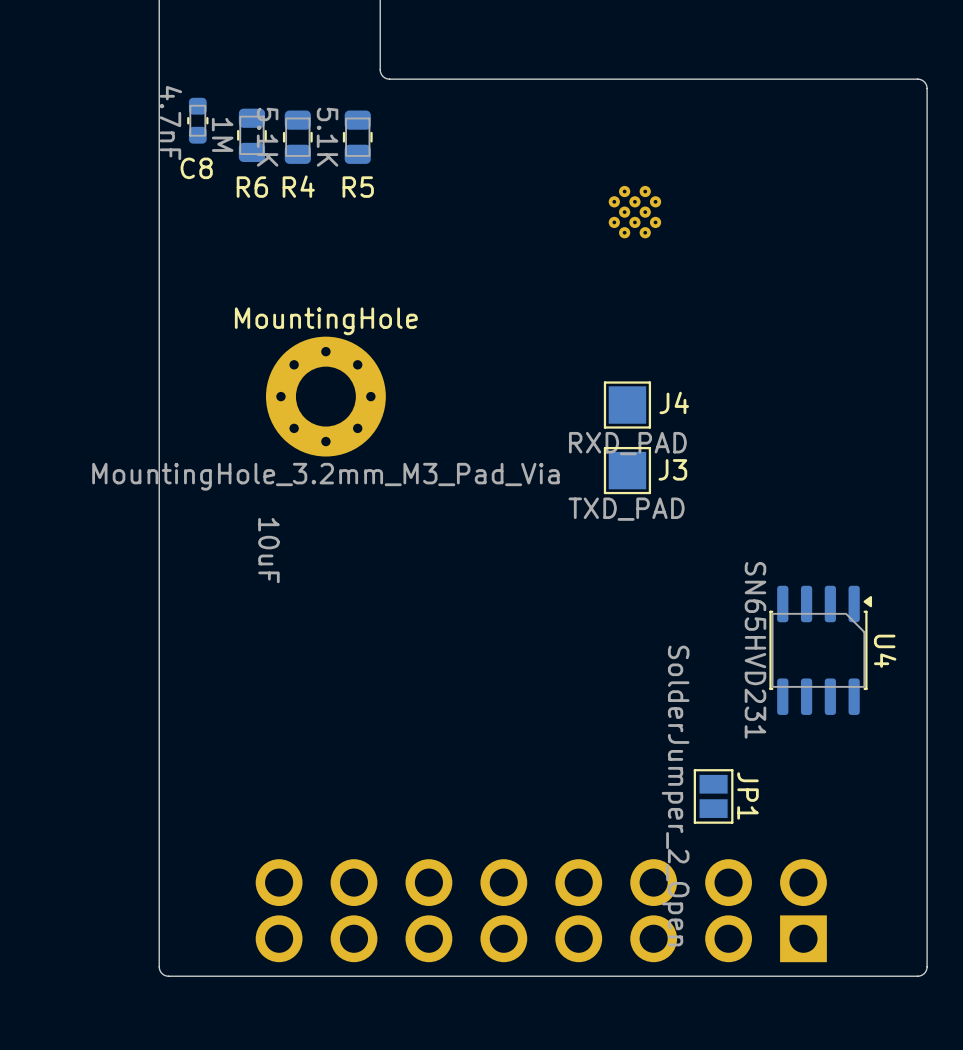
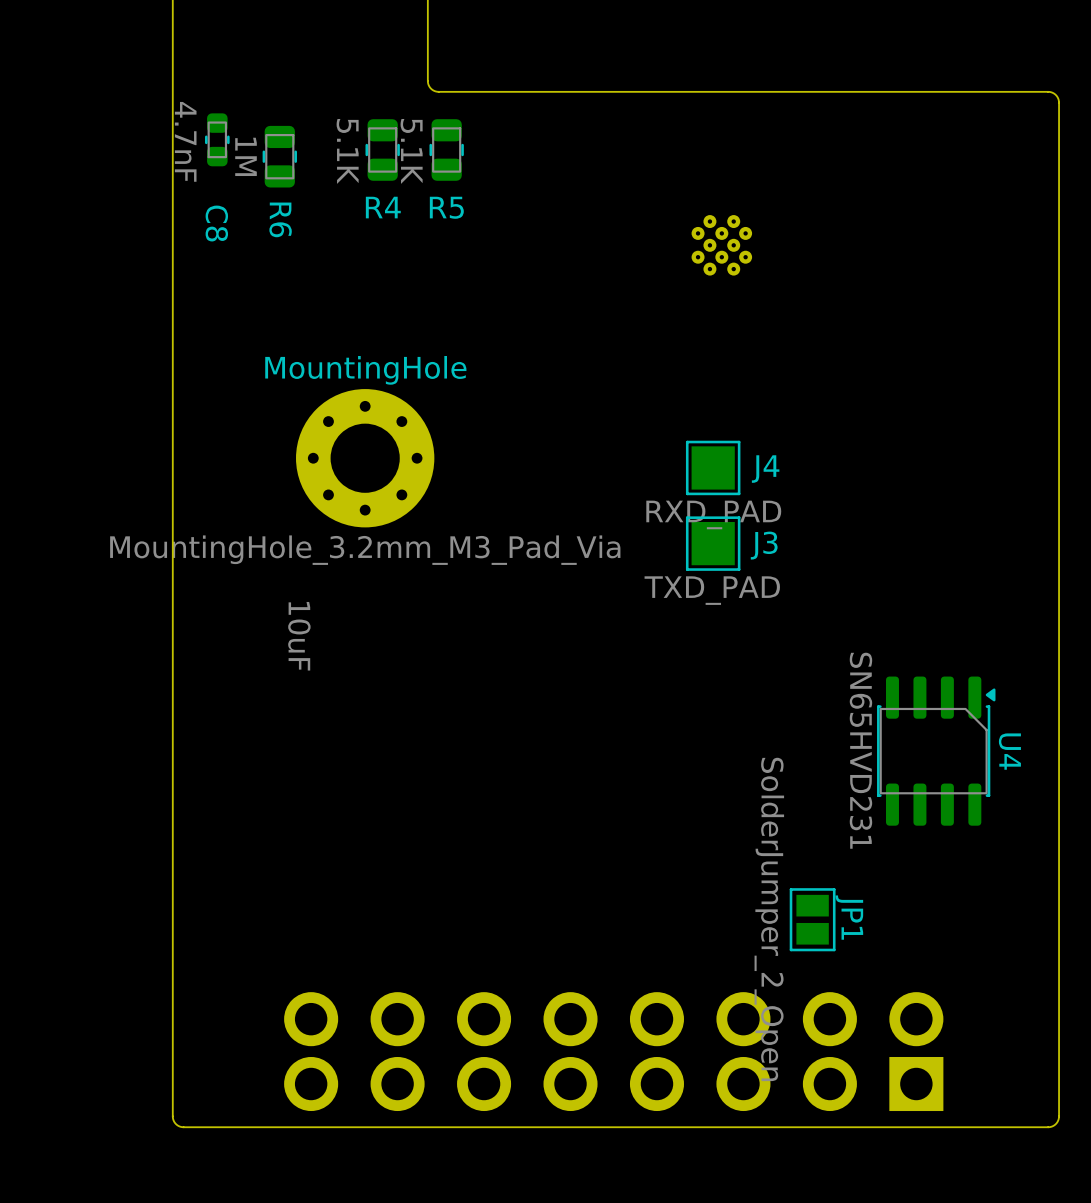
R4 position: (297, 137) -> (382, 149)
R5 position: (357, 137) -> (446, 149)
C8 name rotation: 0° (196, 168) -> 90° clockwise (216, 223)
R6 name rotation: 0° (252, 187) -> 90° clockwise (280, 219)

